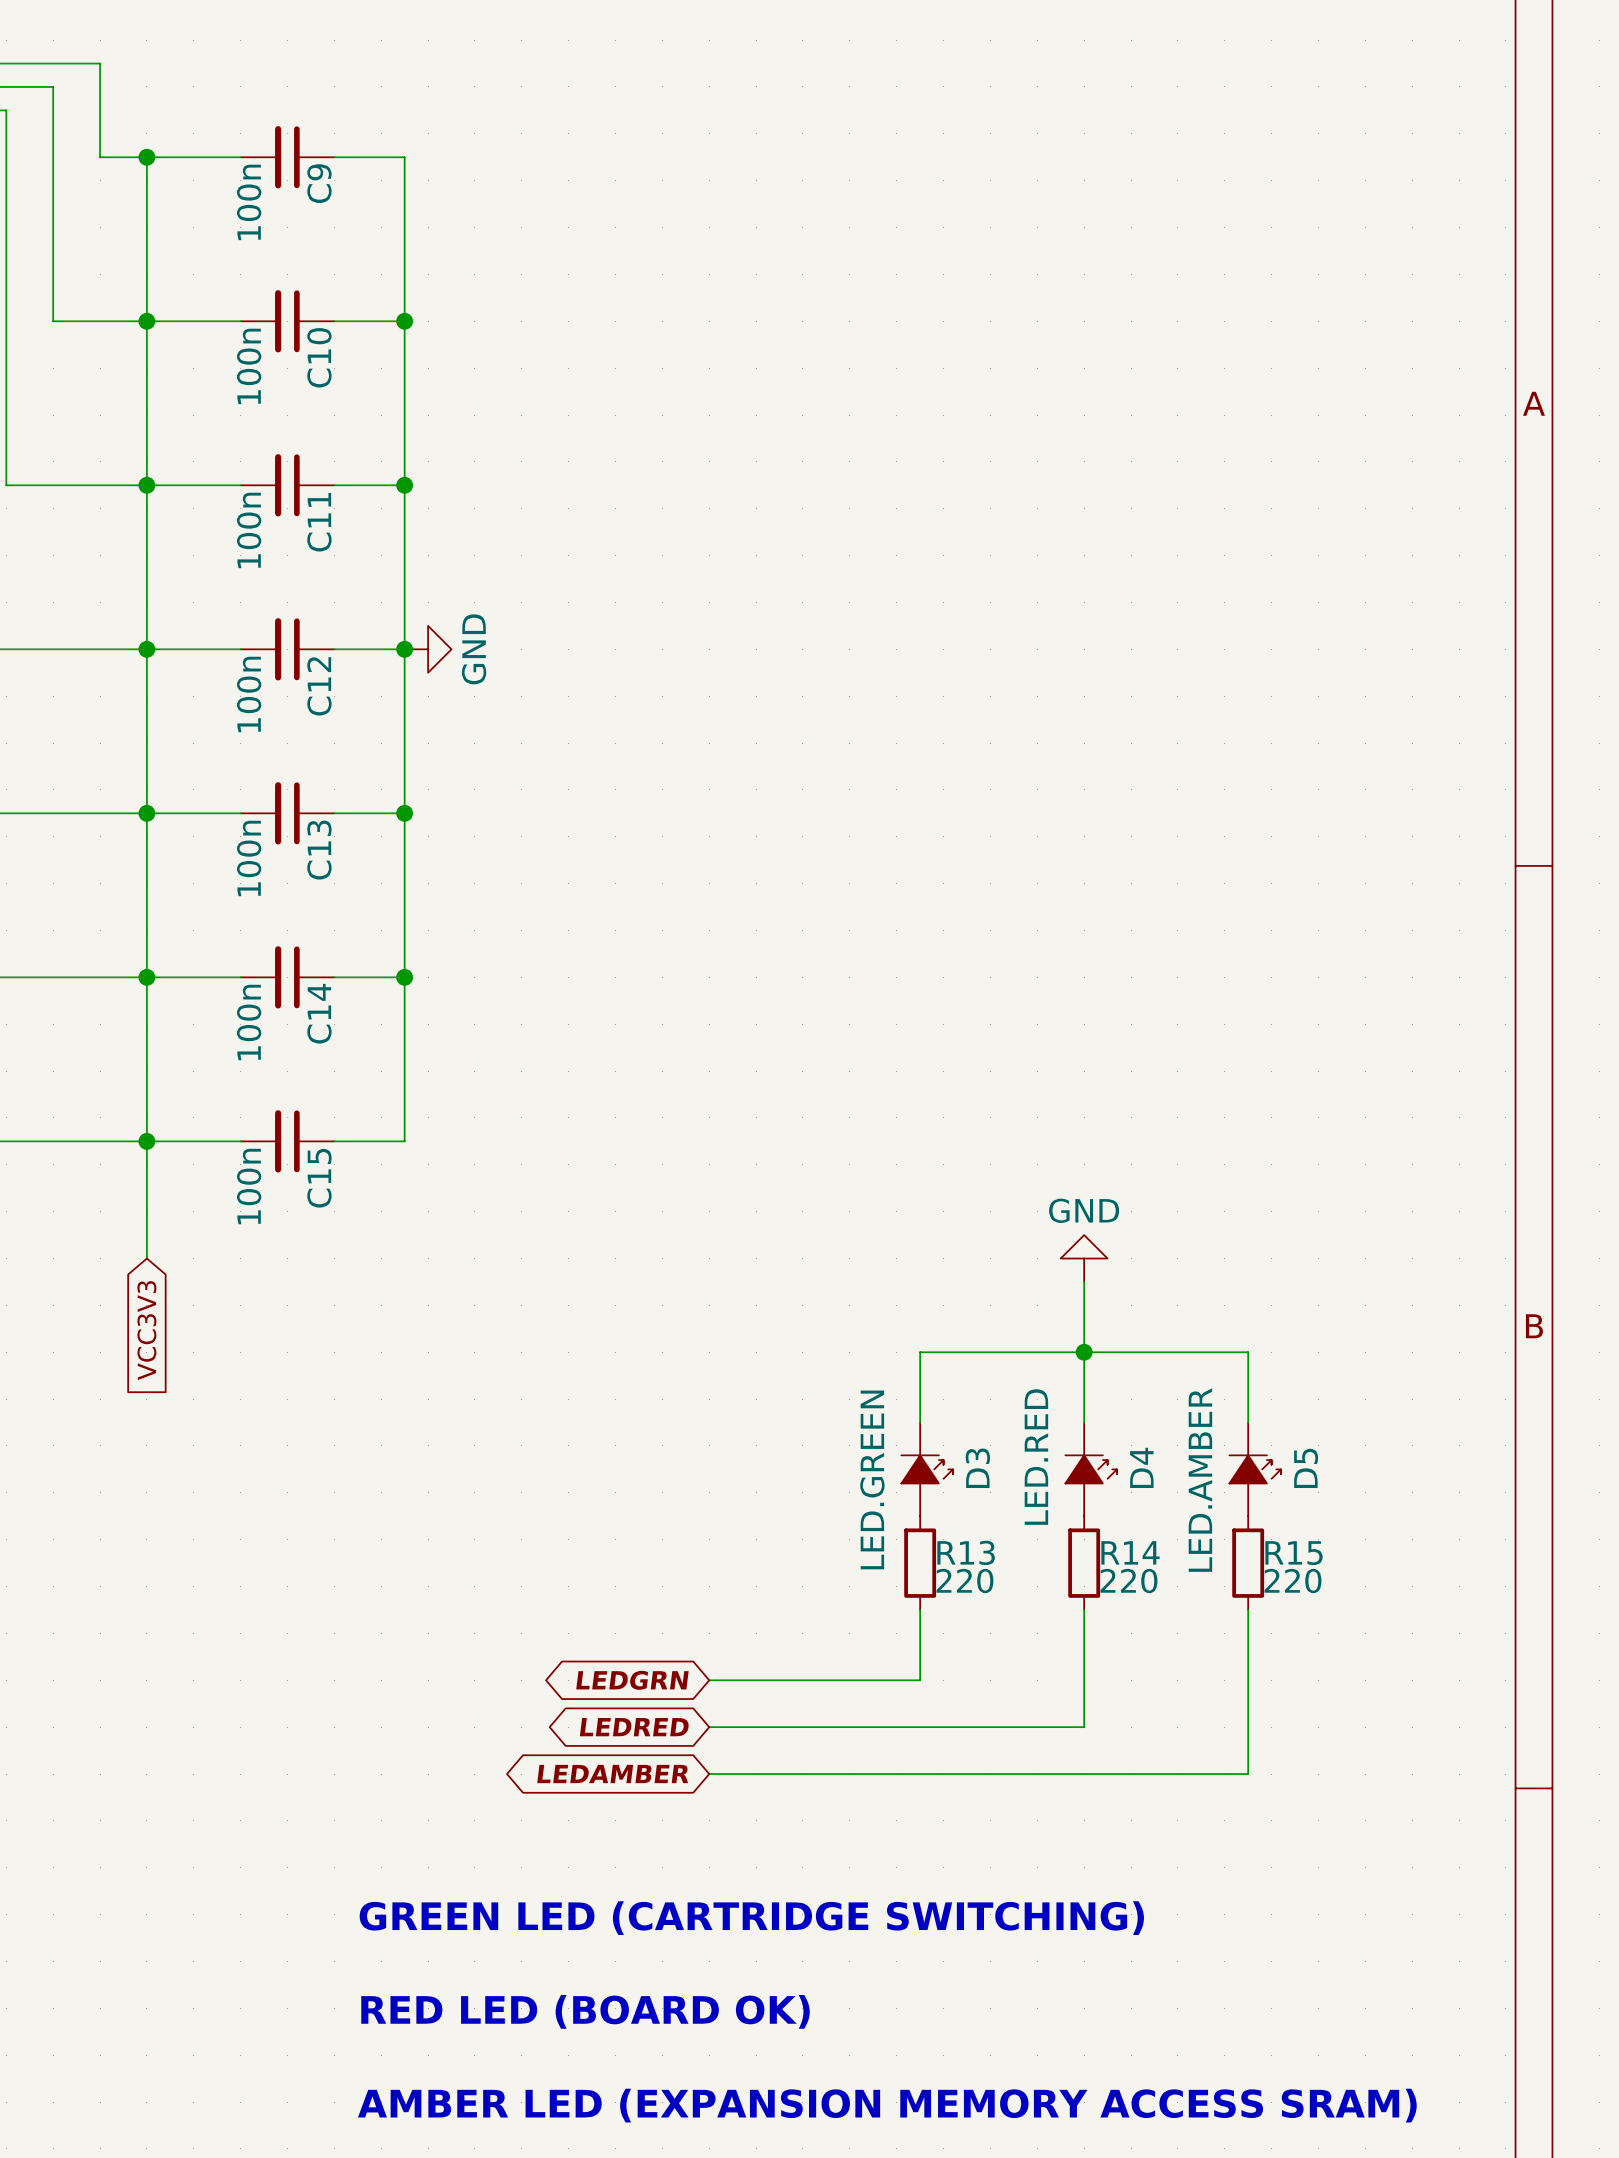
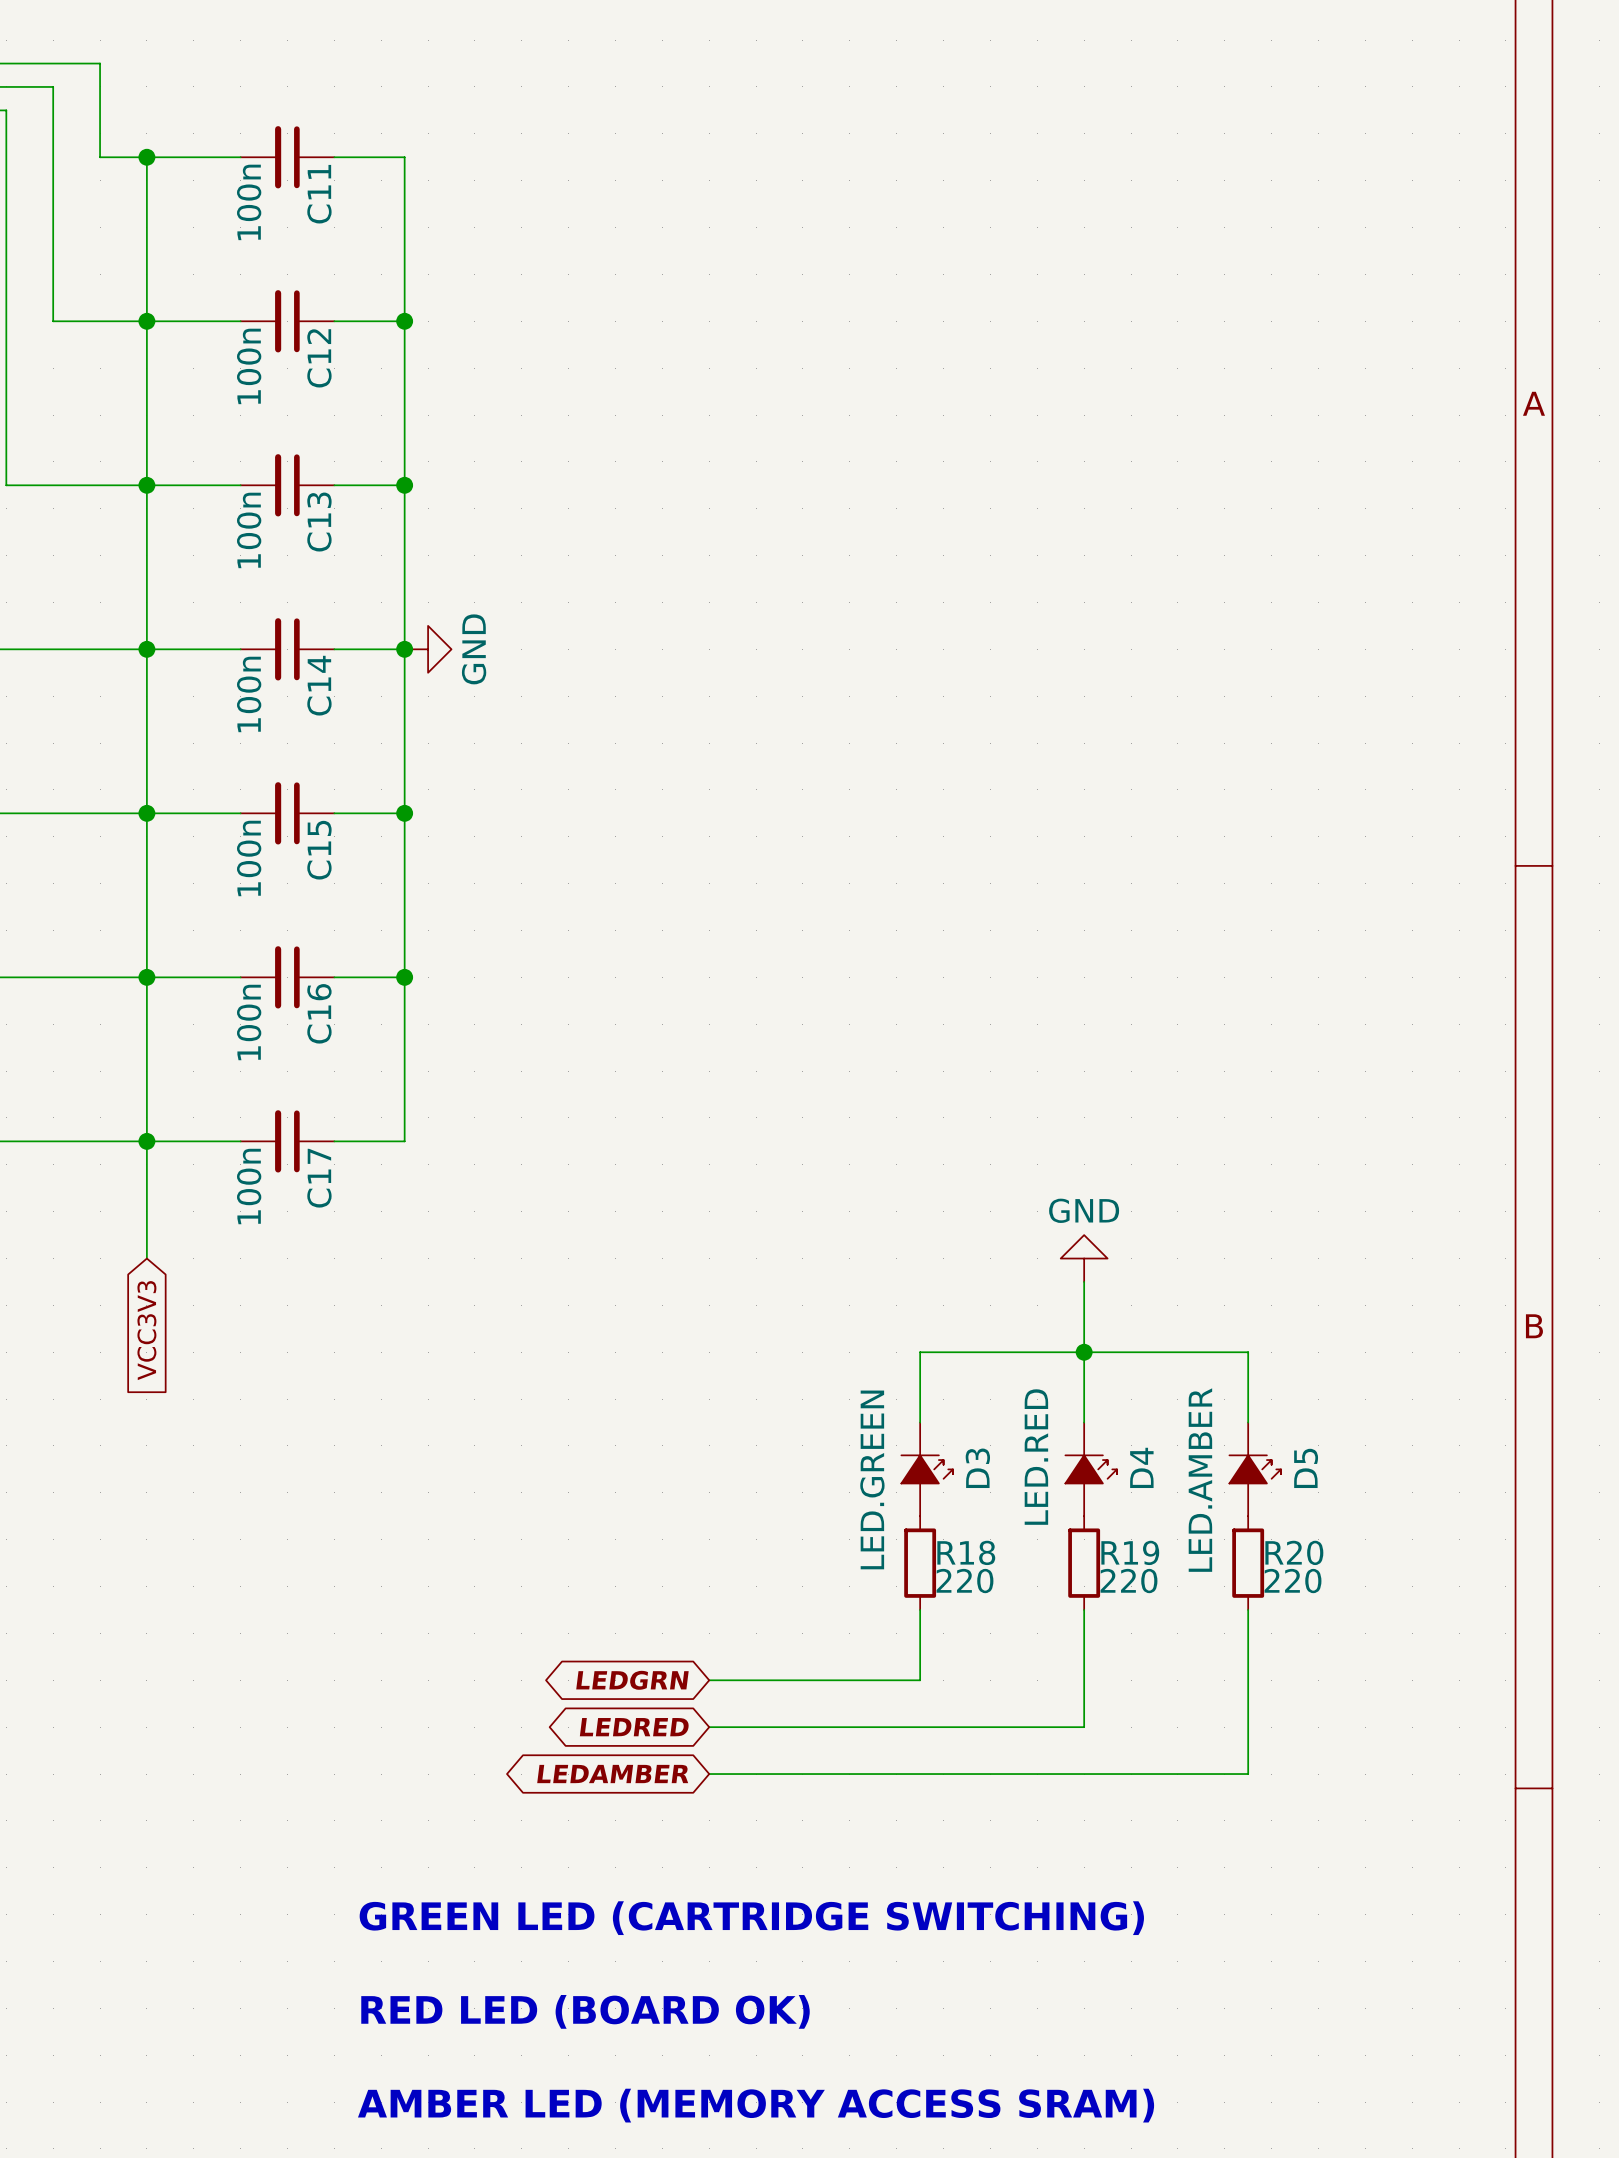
C9 name: C9 (319, 183) -> C11 (319, 194)
C10 name: C10 (319, 357) -> C12 (319, 358)
C11 name: C11 (319, 522) -> C13 (319, 522)
C12 name: C12 (319, 686) -> C14 (319, 685)
C13 name: C13 (319, 850) -> C15 (319, 850)
C14 name: C14 (319, 1013) -> C16 (319, 1013)
C15 name: C15 (319, 1178) -> C17 (319, 1178)
R13 name: R13 (966, 1552) -> R18 (966, 1552)
R14 name: R14 (1130, 1552) -> R19 (1130, 1552)
R15 name: R15 (1294, 1553) -> R20 (1294, 1552)
text: AMBER LED (EXPANSION MEMORY ACCESS SRAM) (887, 2105) -> AMBER LED (MEMORY ACCESS SRAM) (756, 2105)

